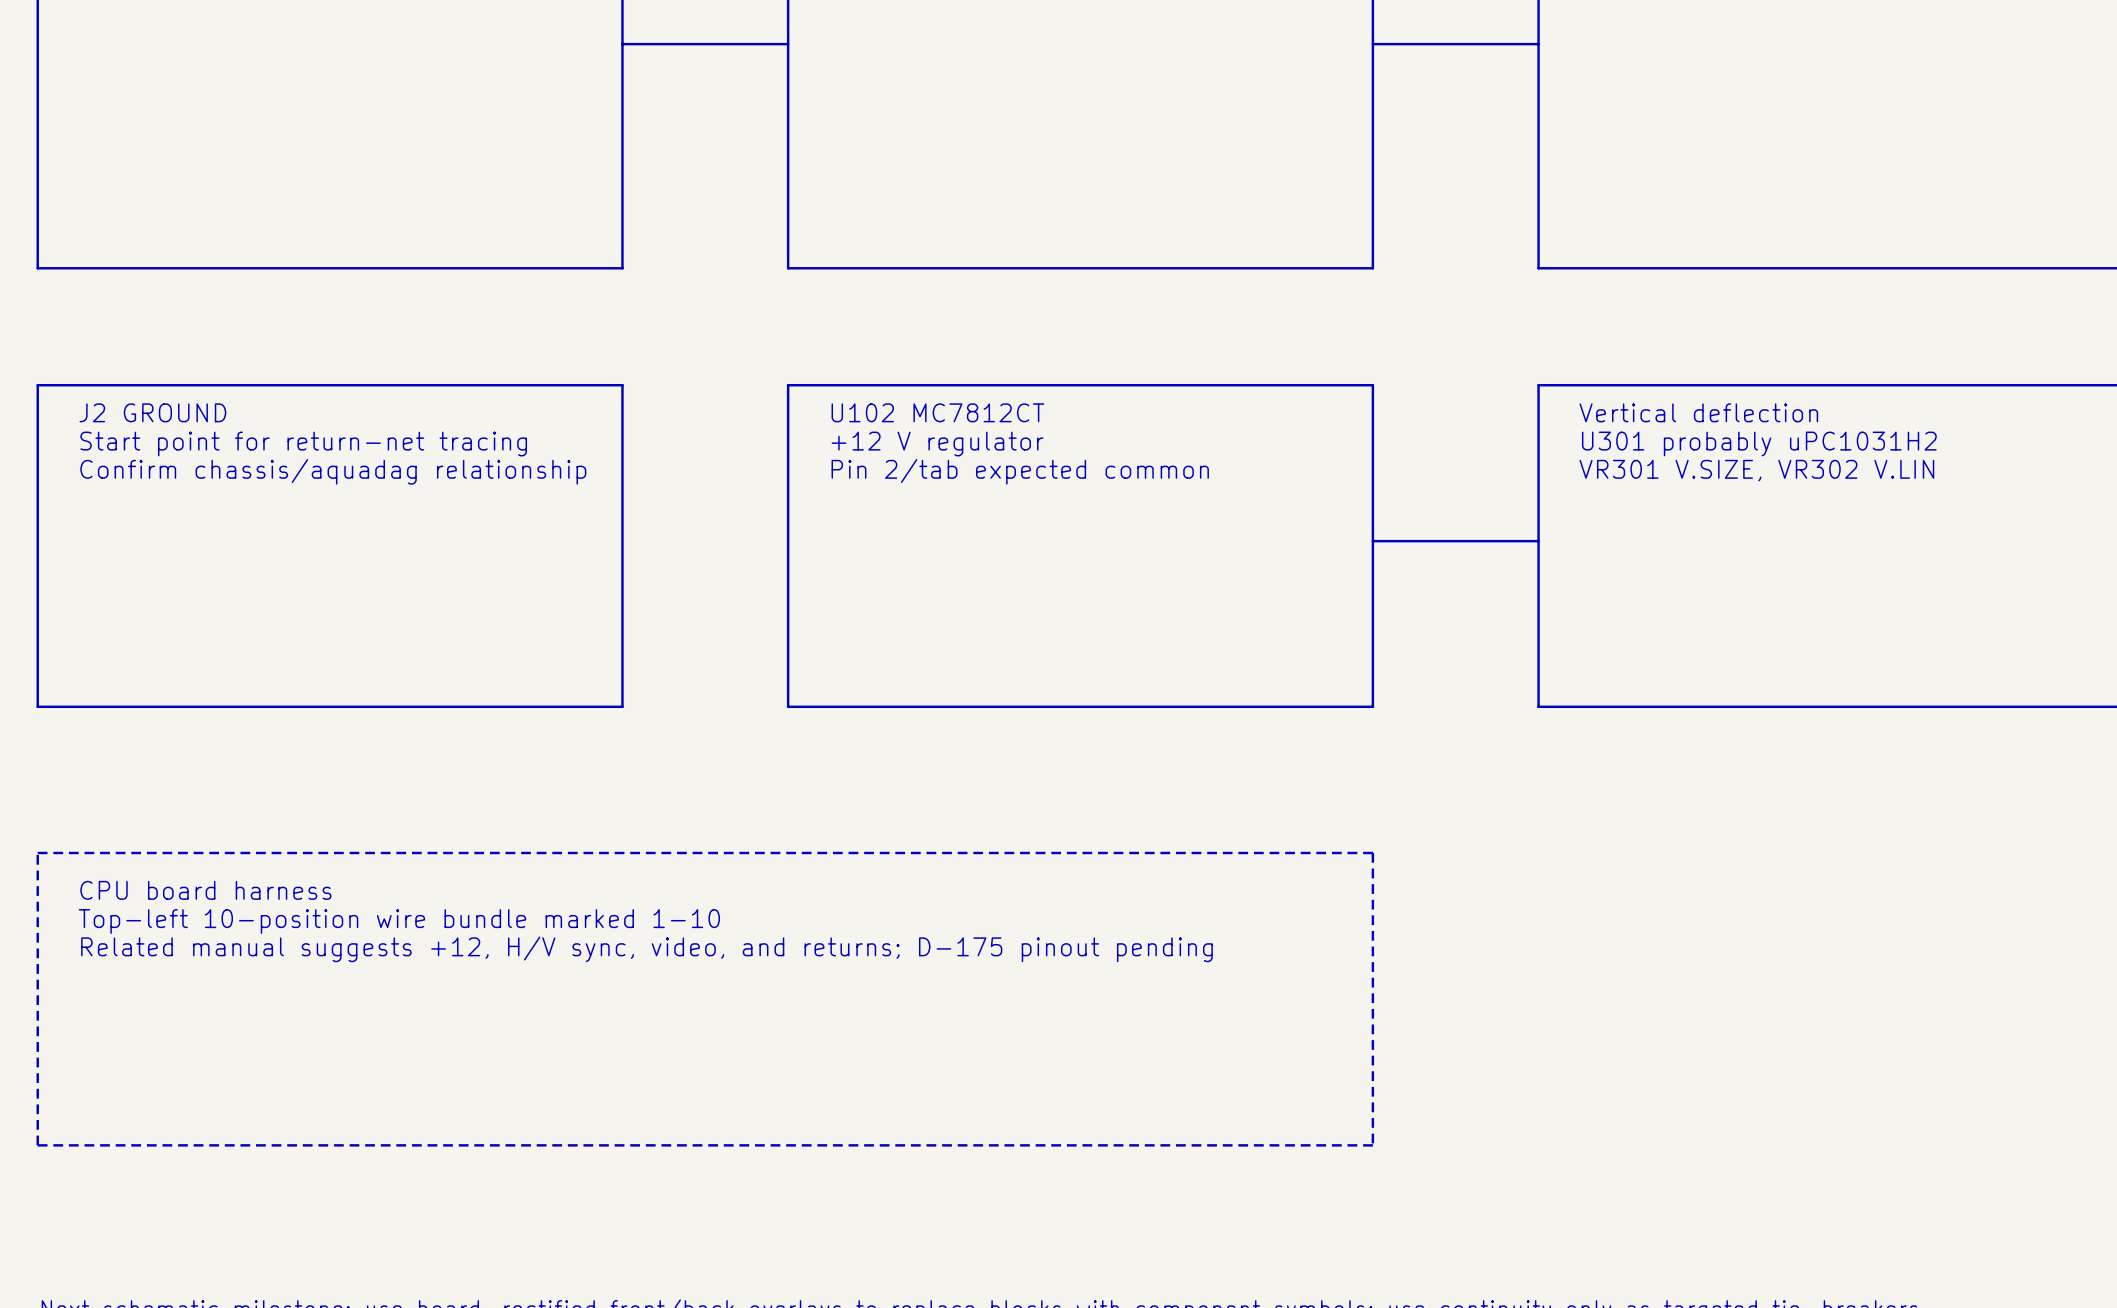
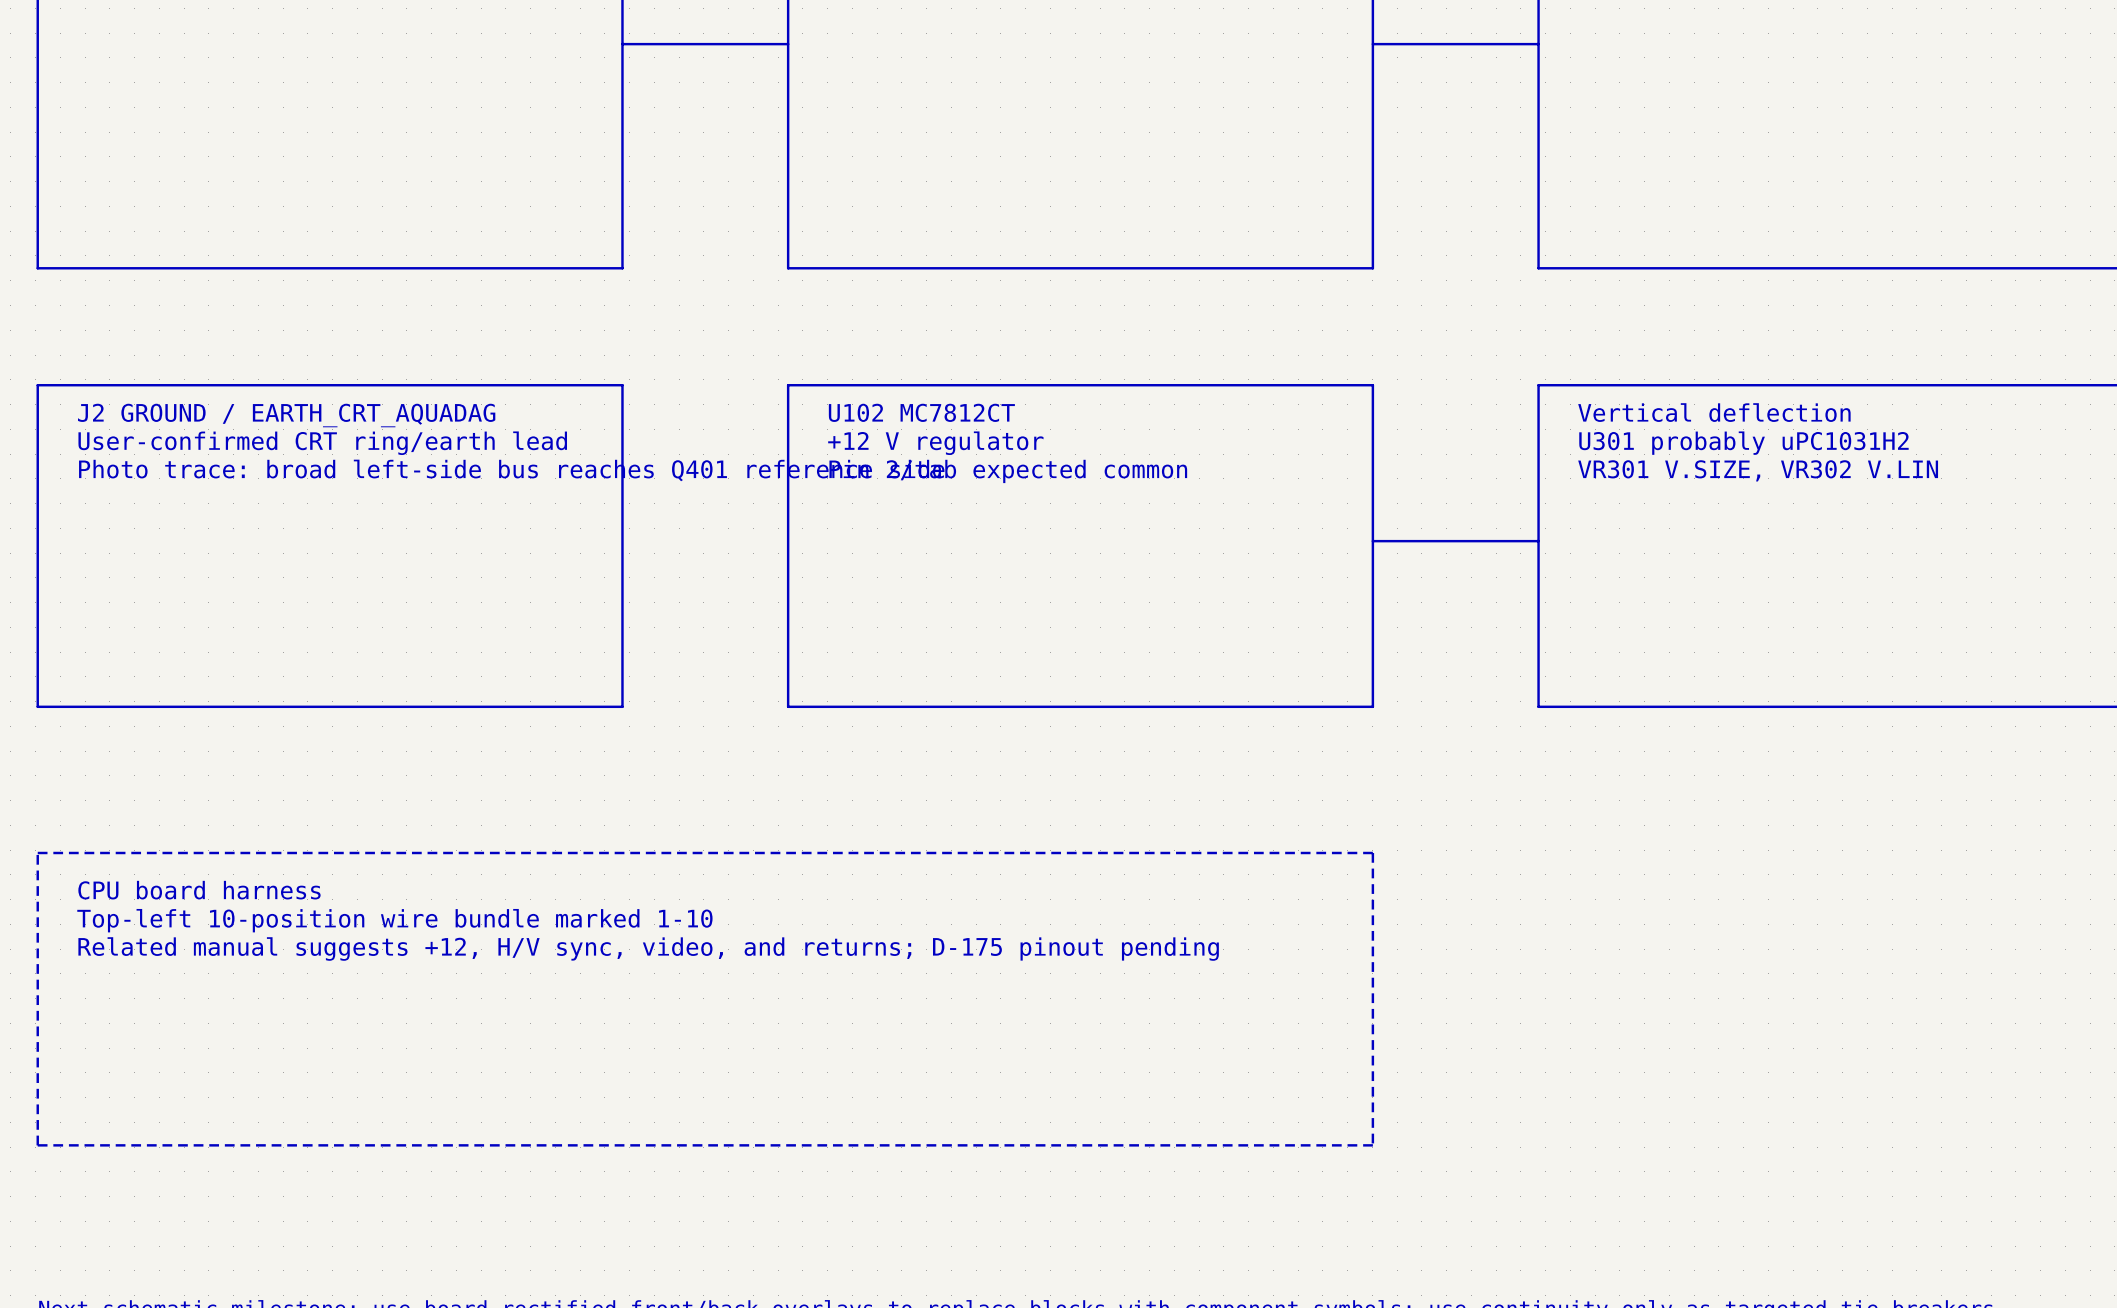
text: J2 GROUND (152, 412) -> J2 GROUND / EARTH_CRT_AQUADAG (286, 415)
text: Start point for return-net tracing (303, 443) -> User-confirmed CRT ring/earth lead (322, 443)
text: Confirm chassis/aquadag relationship (333, 471) -> Photo trace: broad left-side bus reaches Q401 reference side (511, 470)

